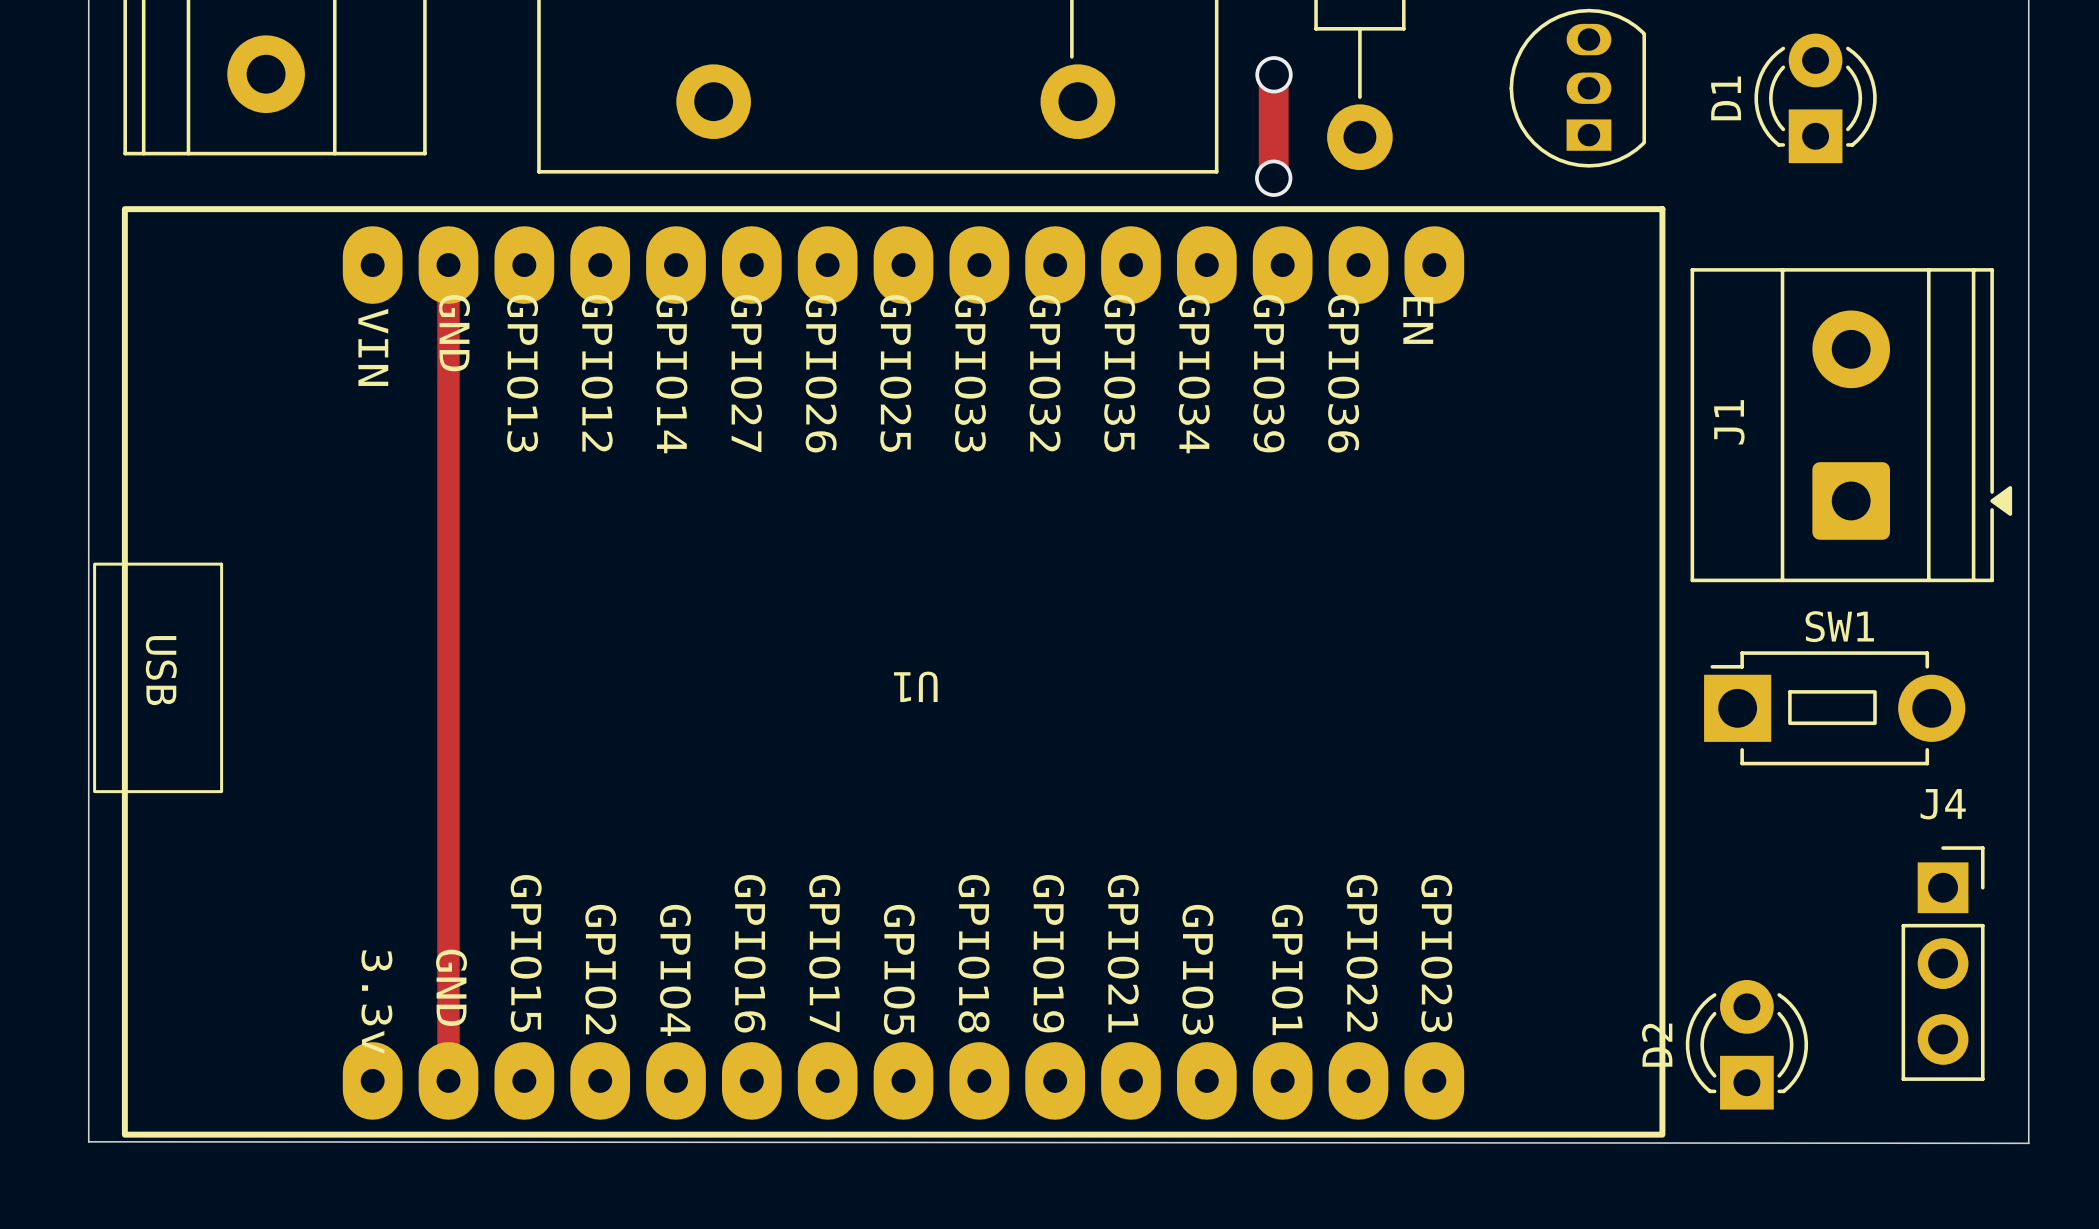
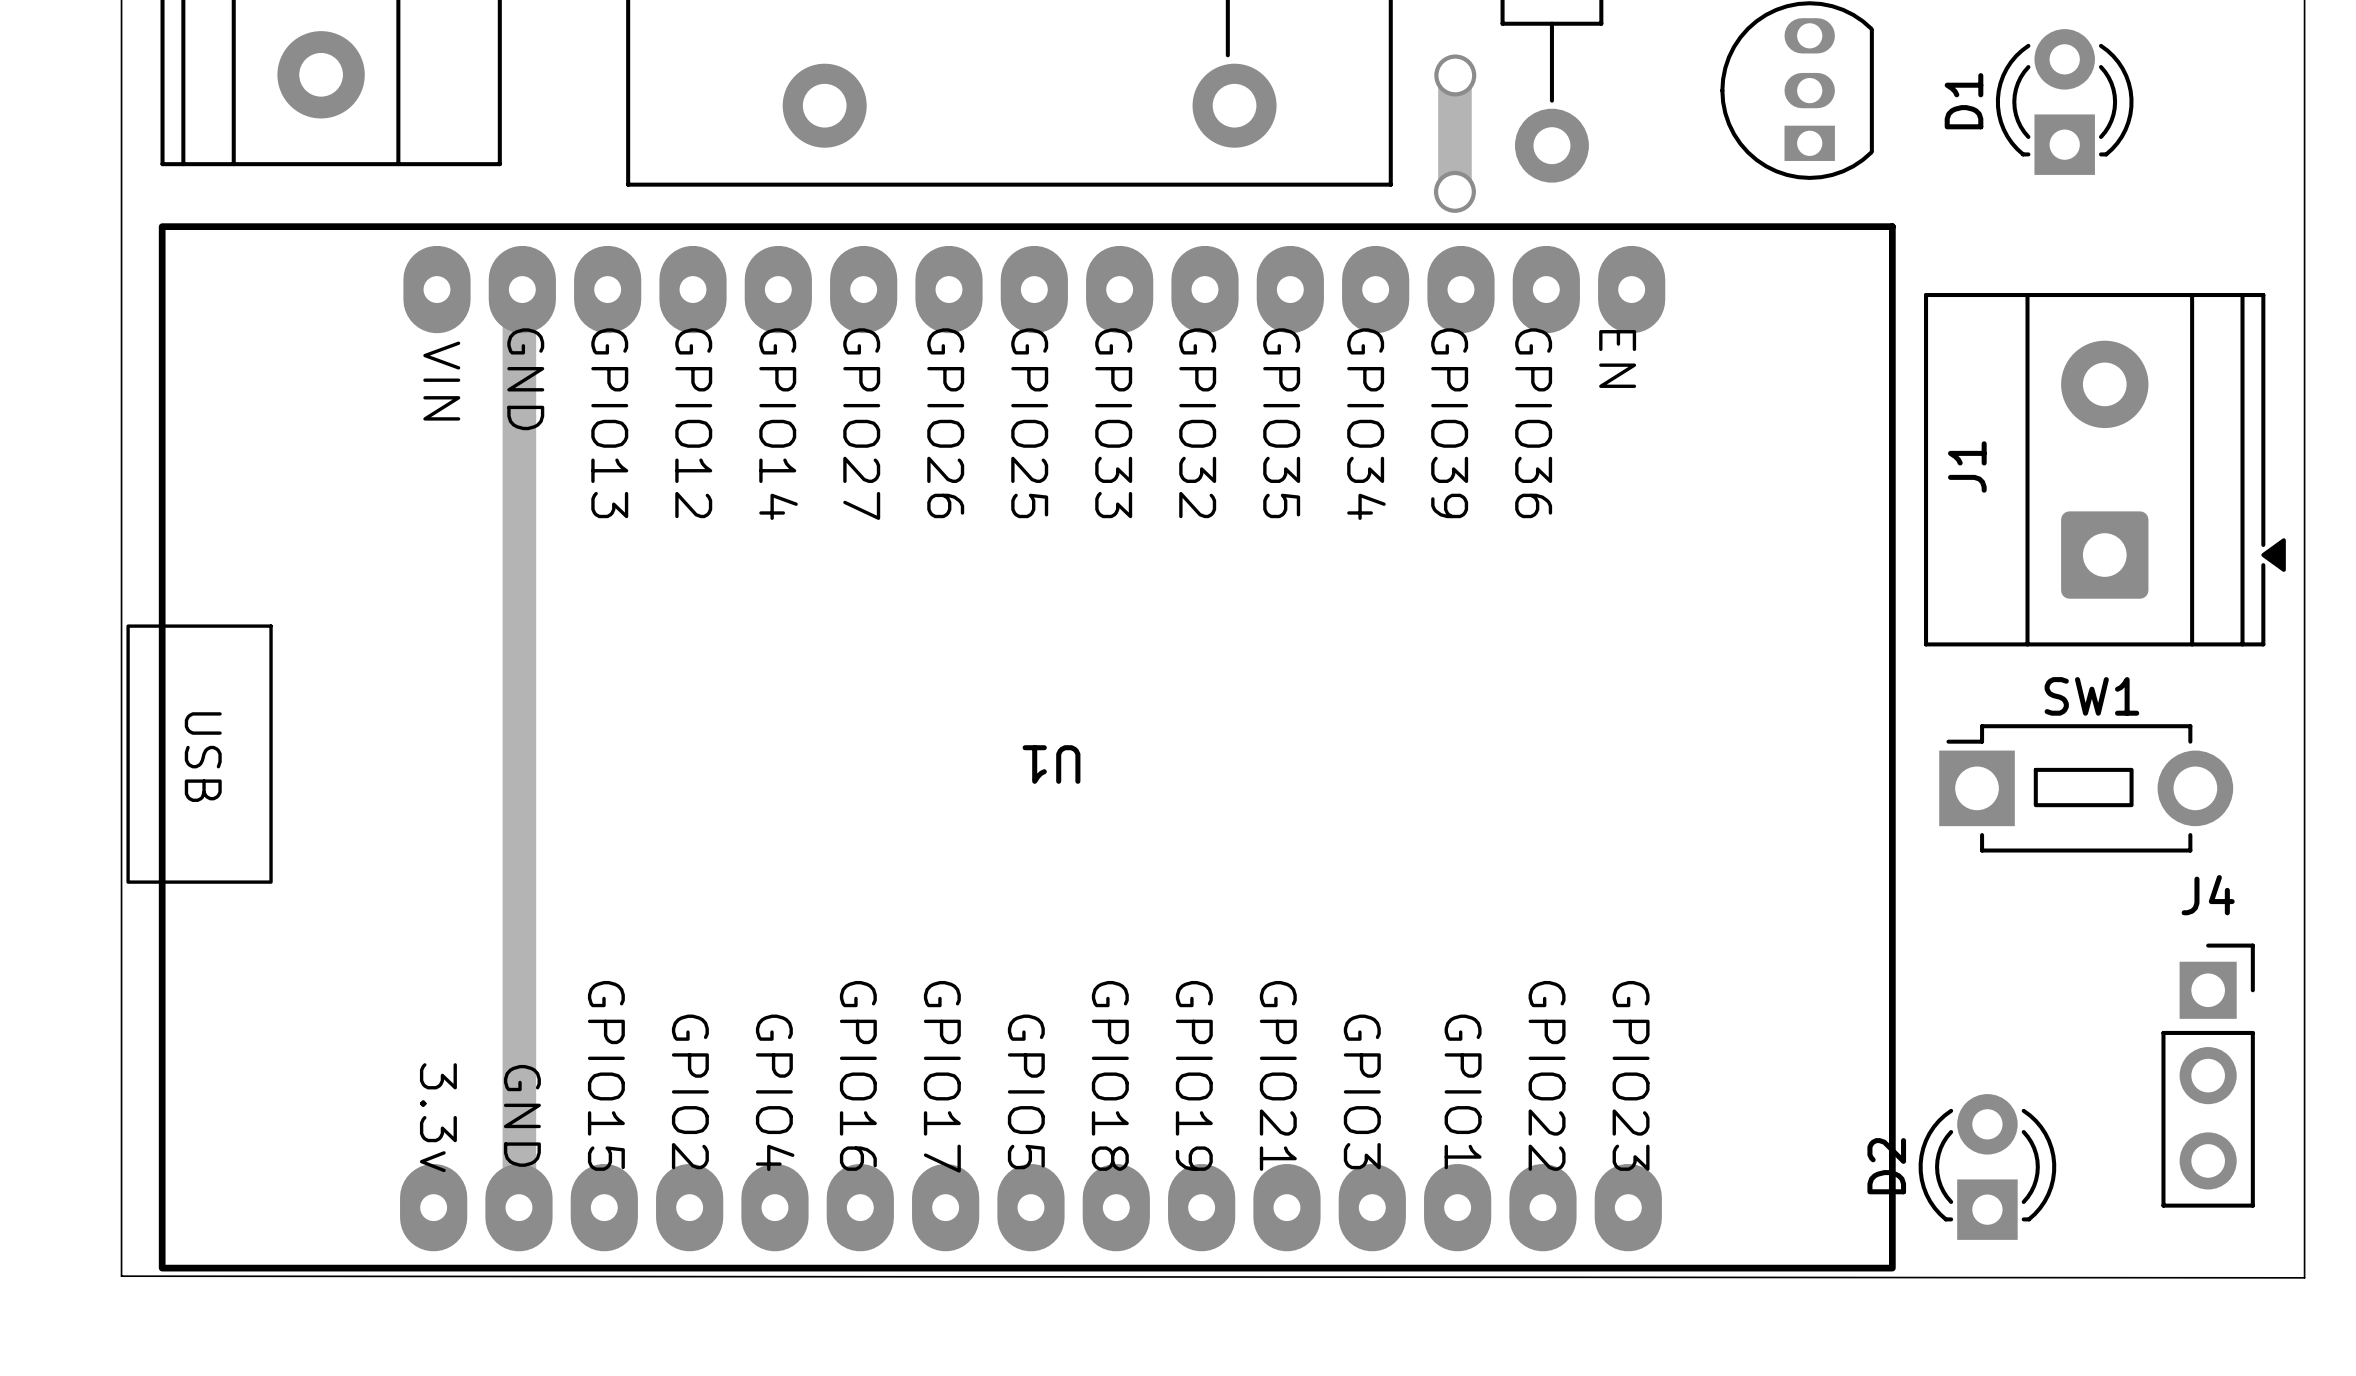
U1 footprint: [93, 206, 1666, 1138] -> [126, 223, 1896, 1272]
track: none -> (522, 289) (519, 292) (519, 1207)
track: (448, 265) (448, 1080) -> none

